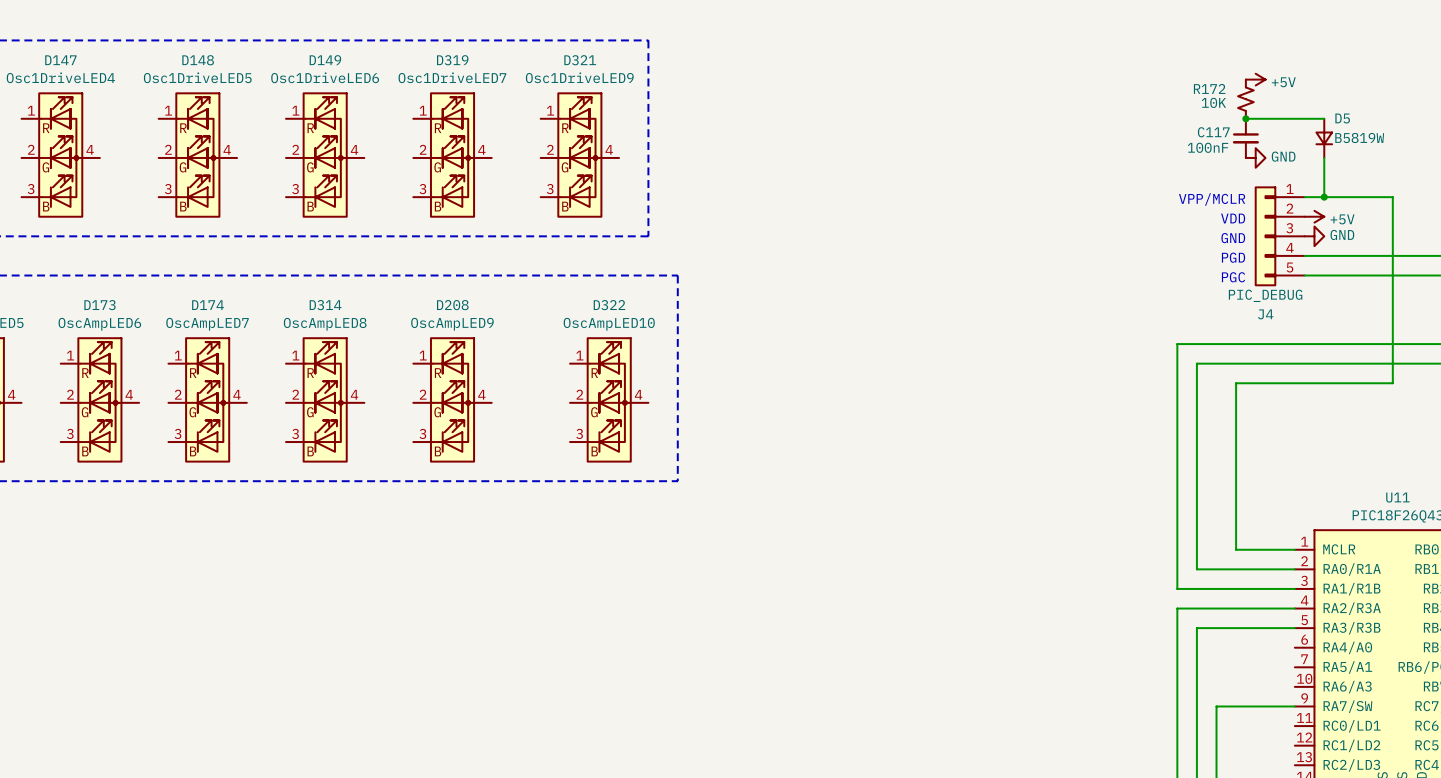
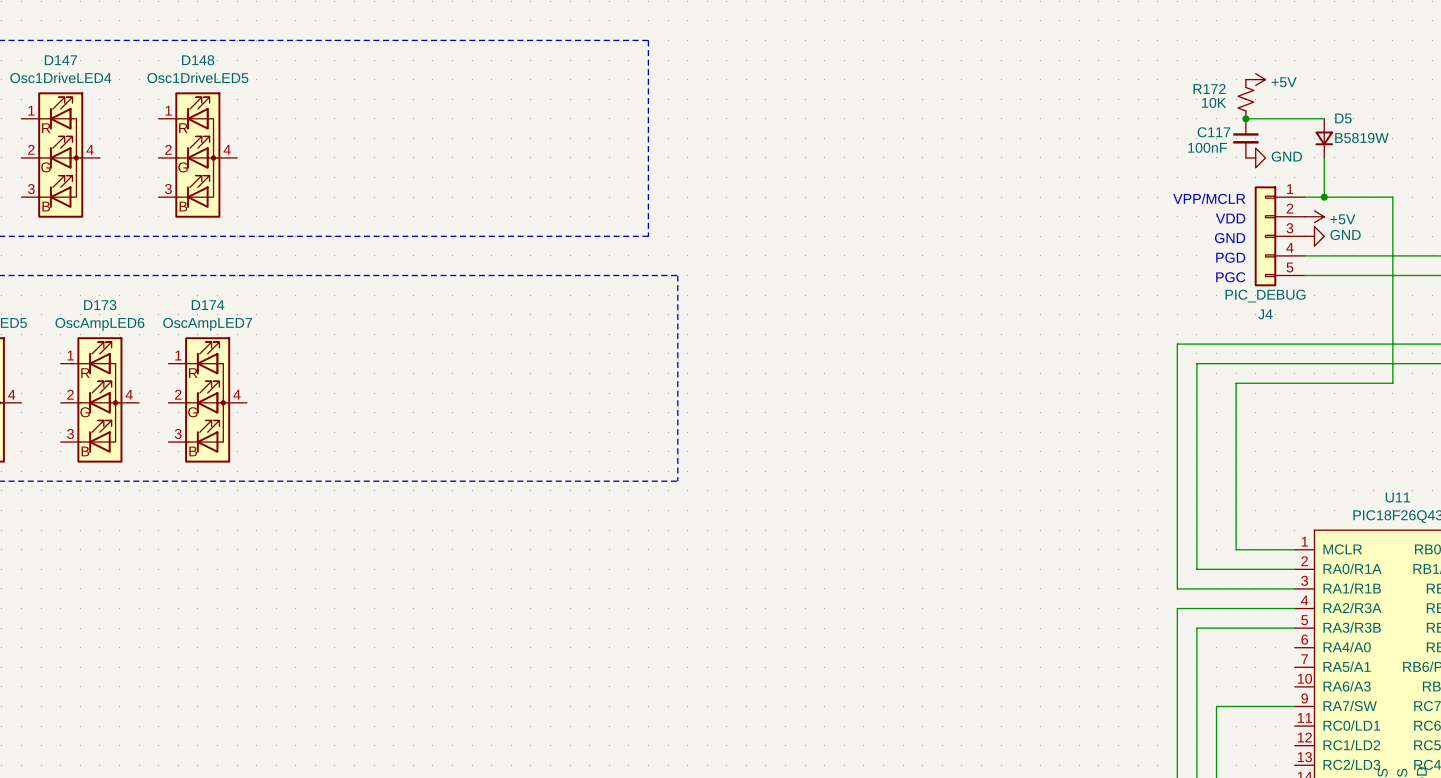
D149: Osc1DriveLED6 (325, 155) -> none
D319: Osc1DriveLED7 (452, 155) -> none
D321: Osc1DriveLED9 (579, 155) -> none
D314: OscAmpLED8 (325, 399) -> none
D208: OscAmpLED9 (452, 399) -> none
D322: OscAmpLED10 (609, 399) -> none

